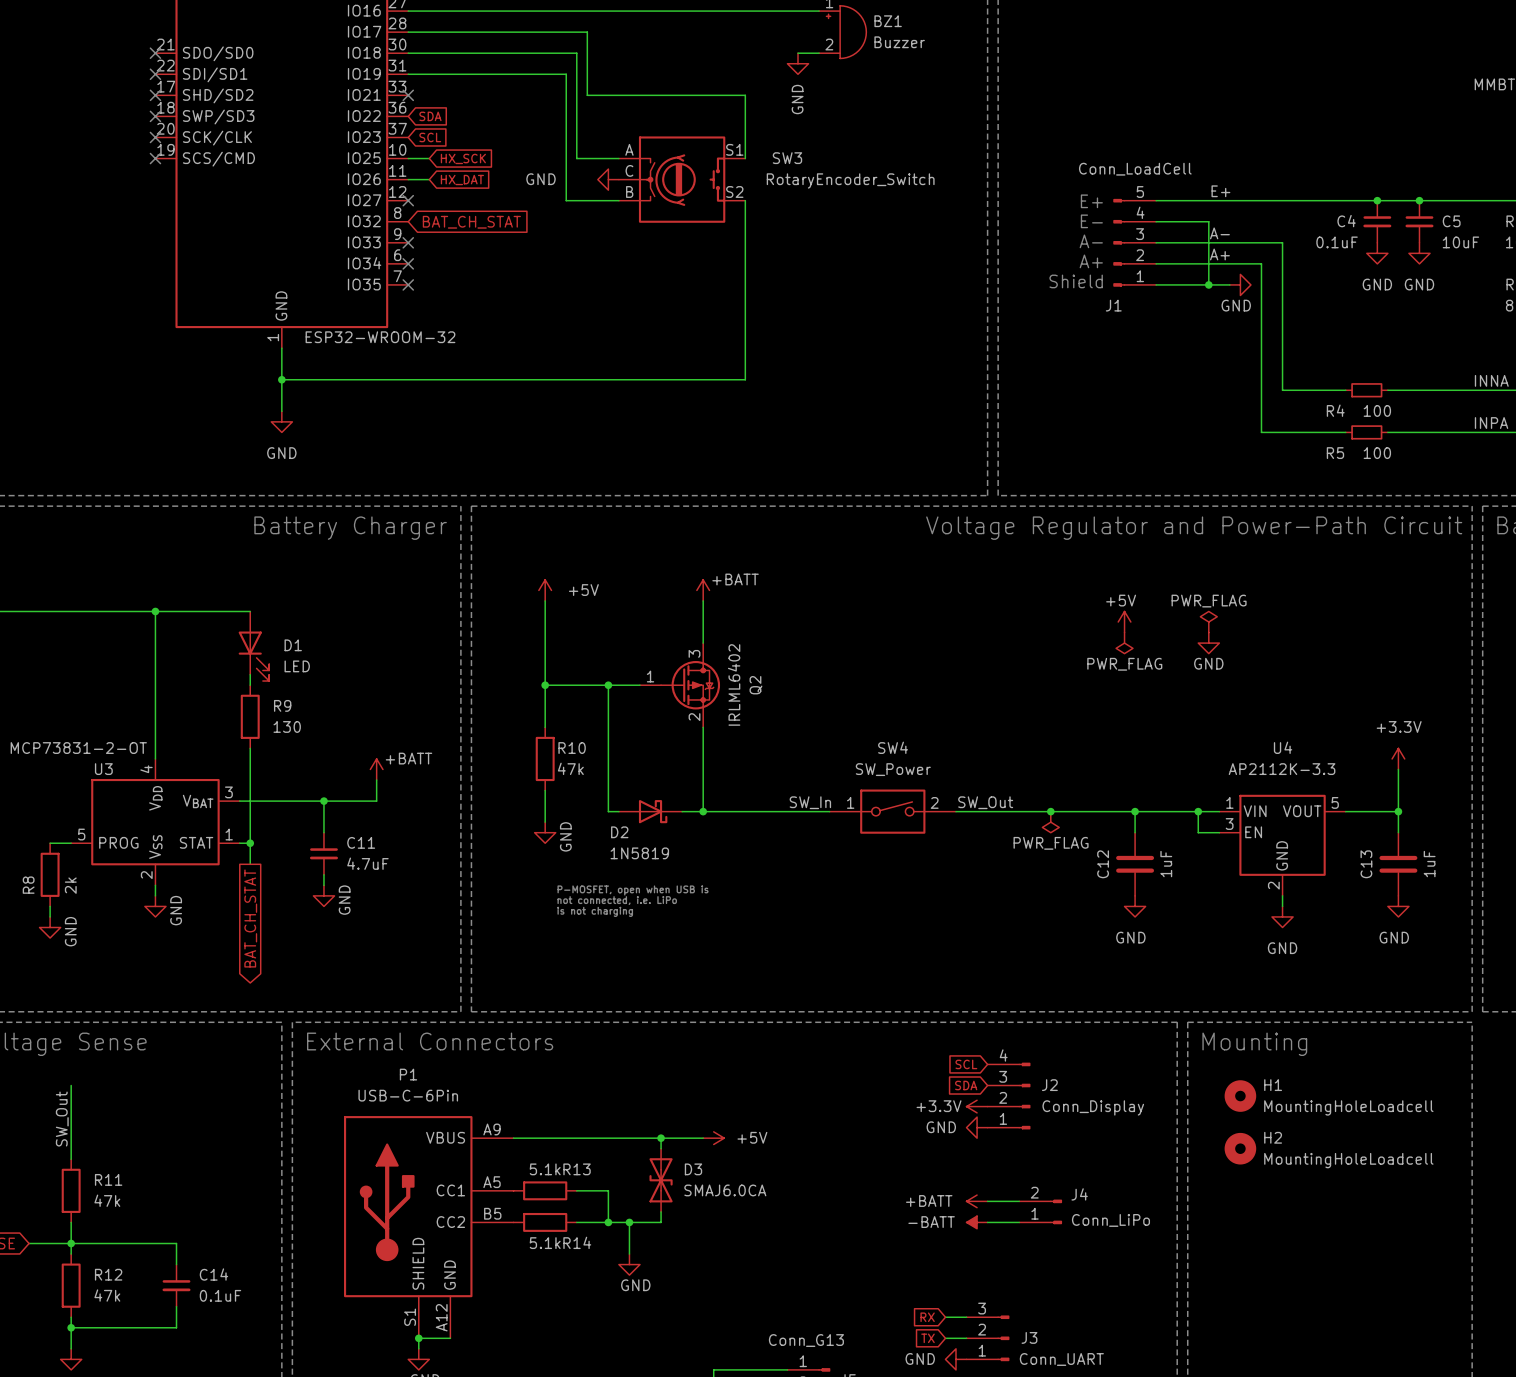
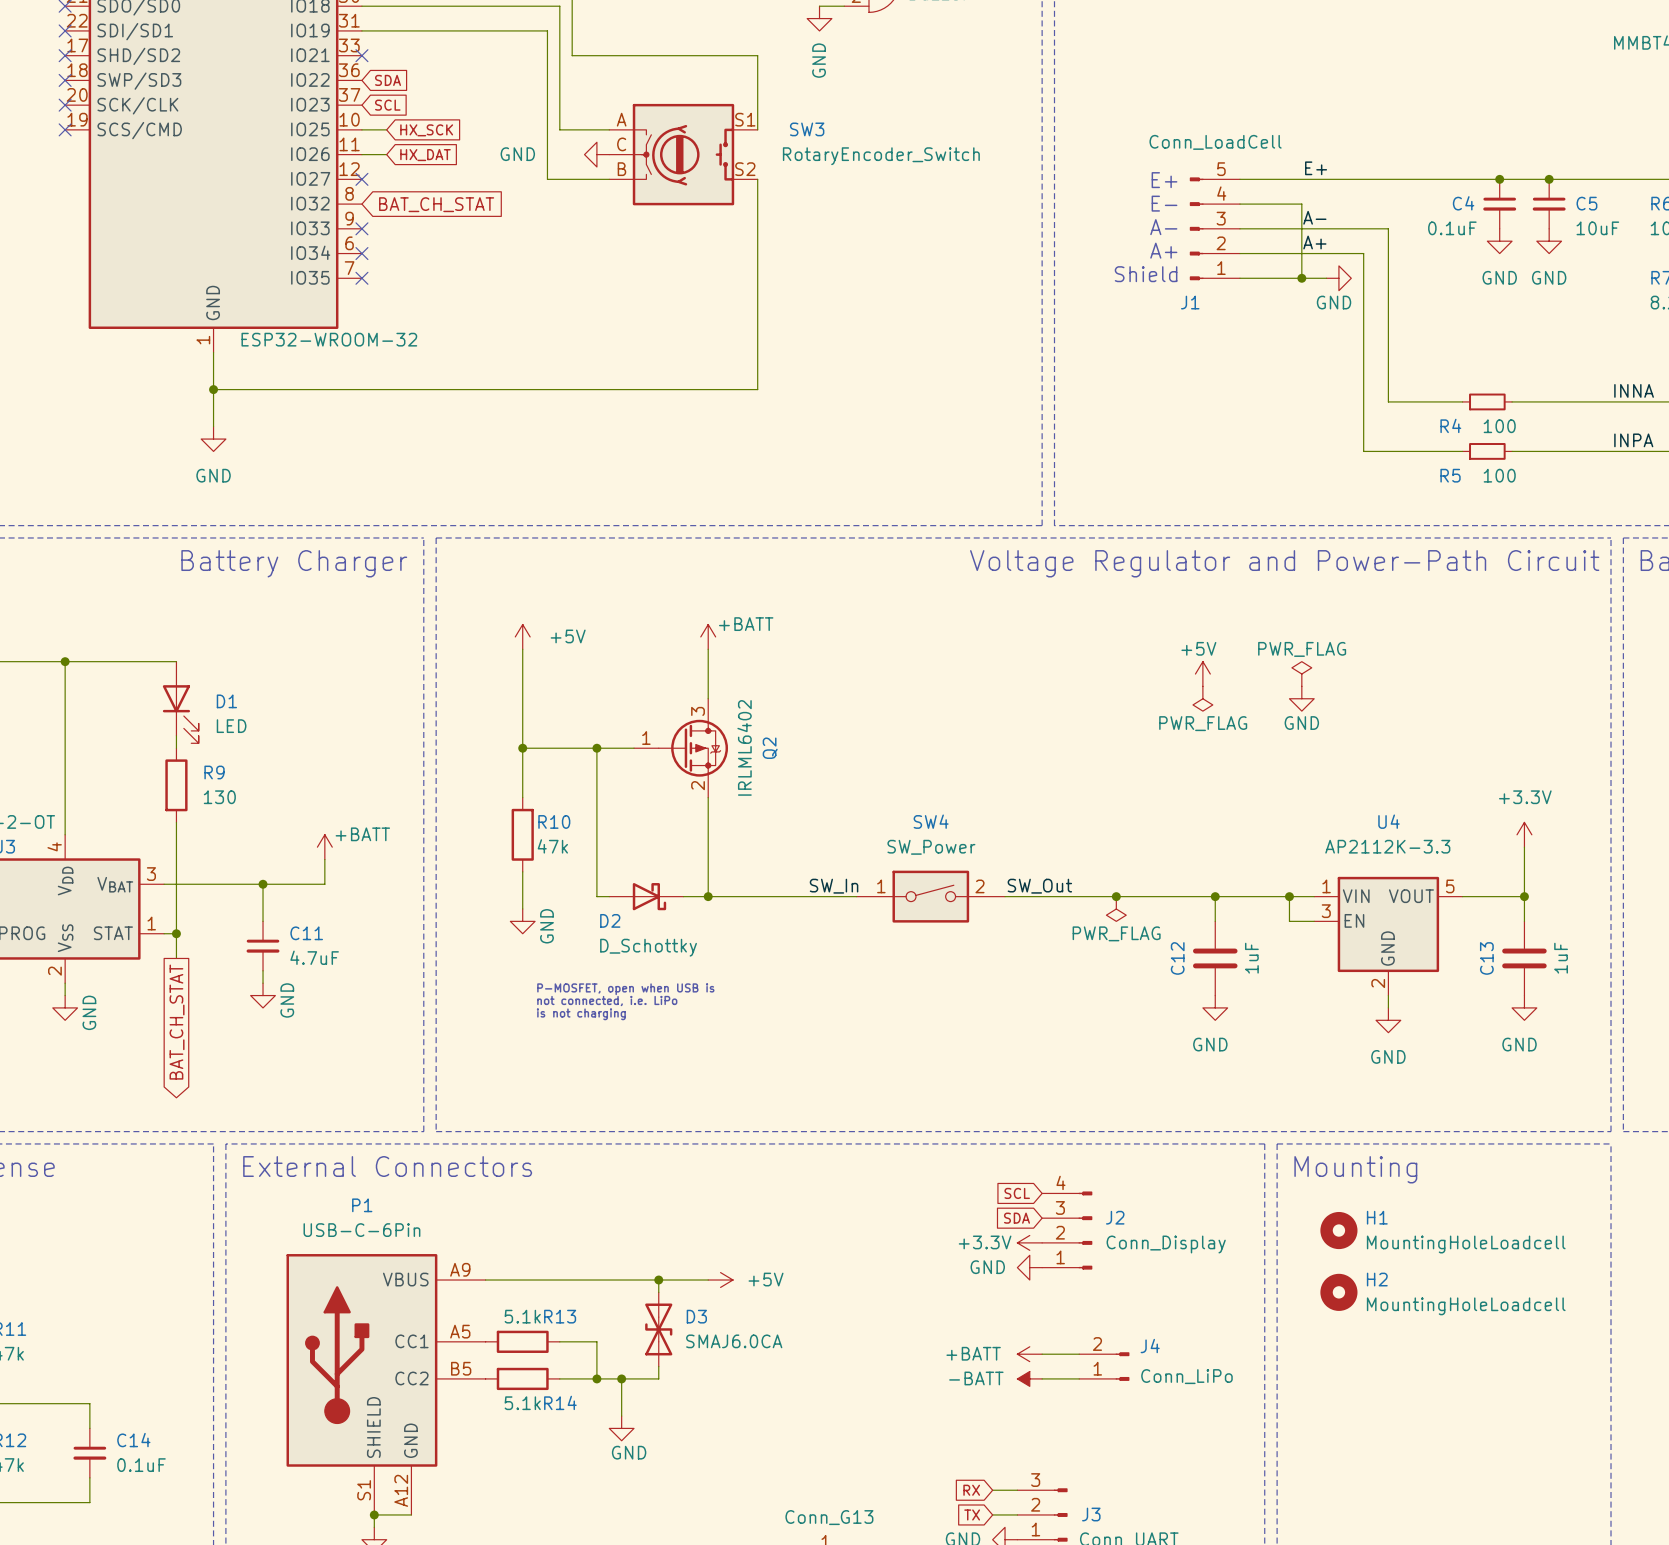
D2 value: 1N5819 (639, 853) -> D_Schottky (648, 947)

